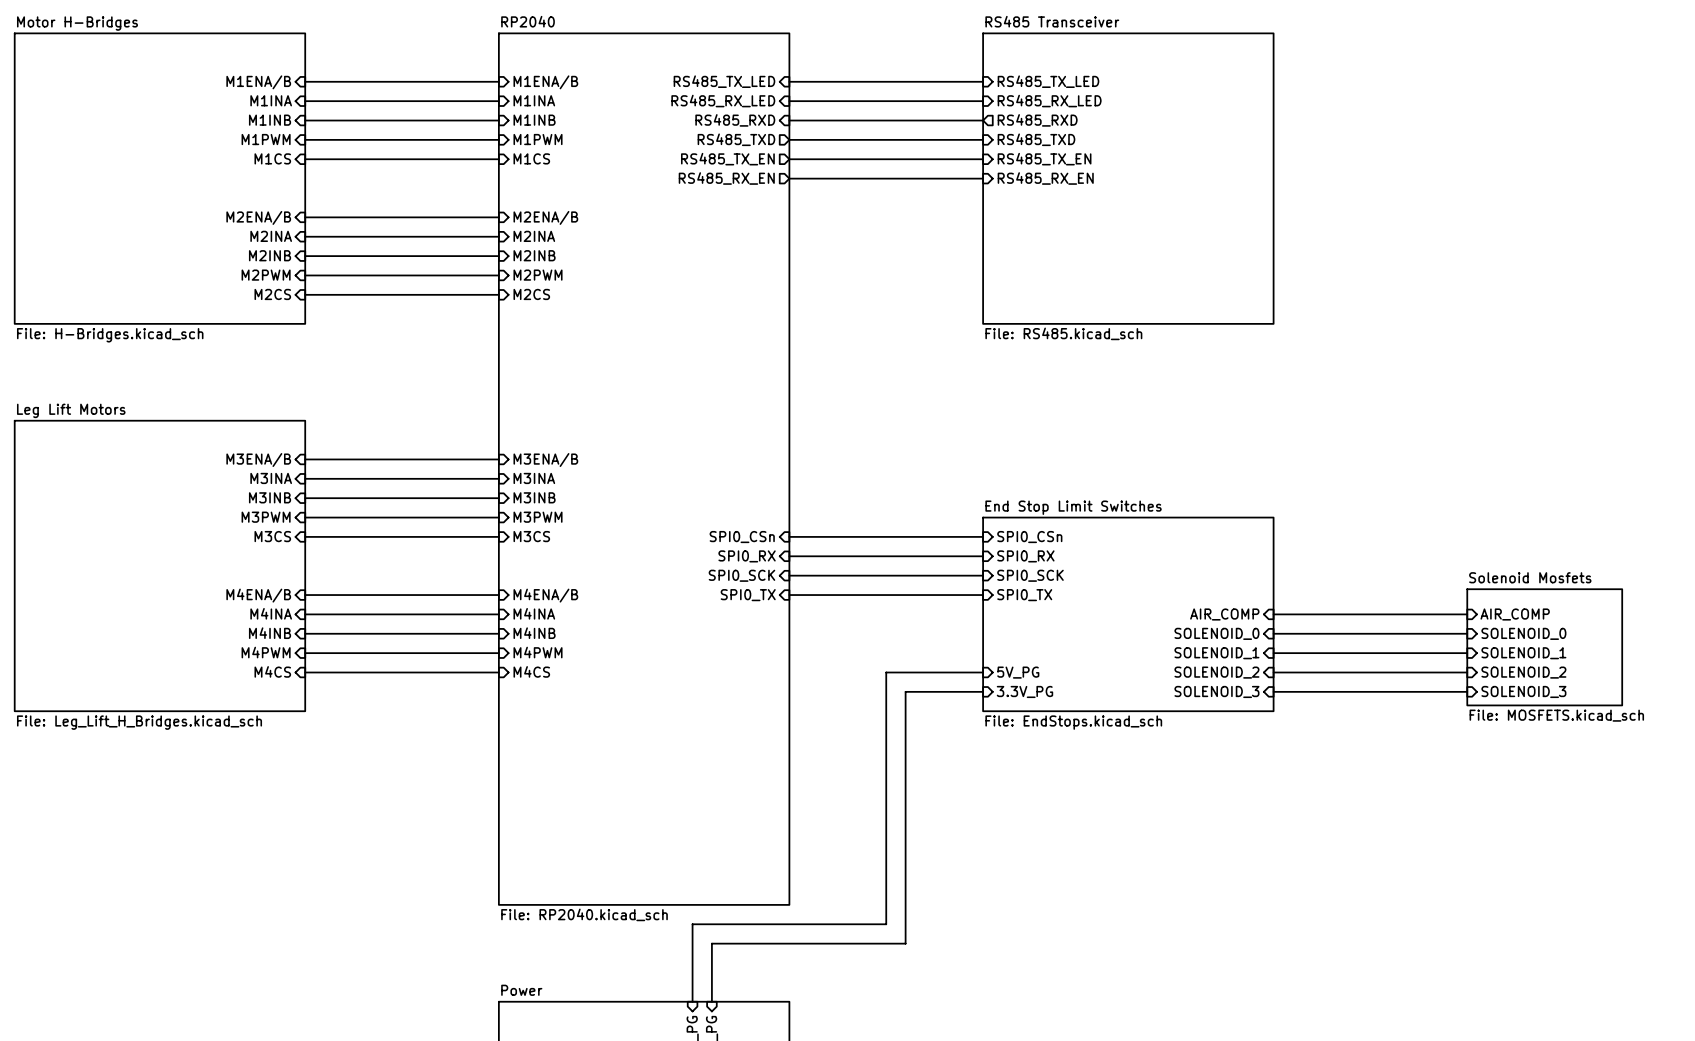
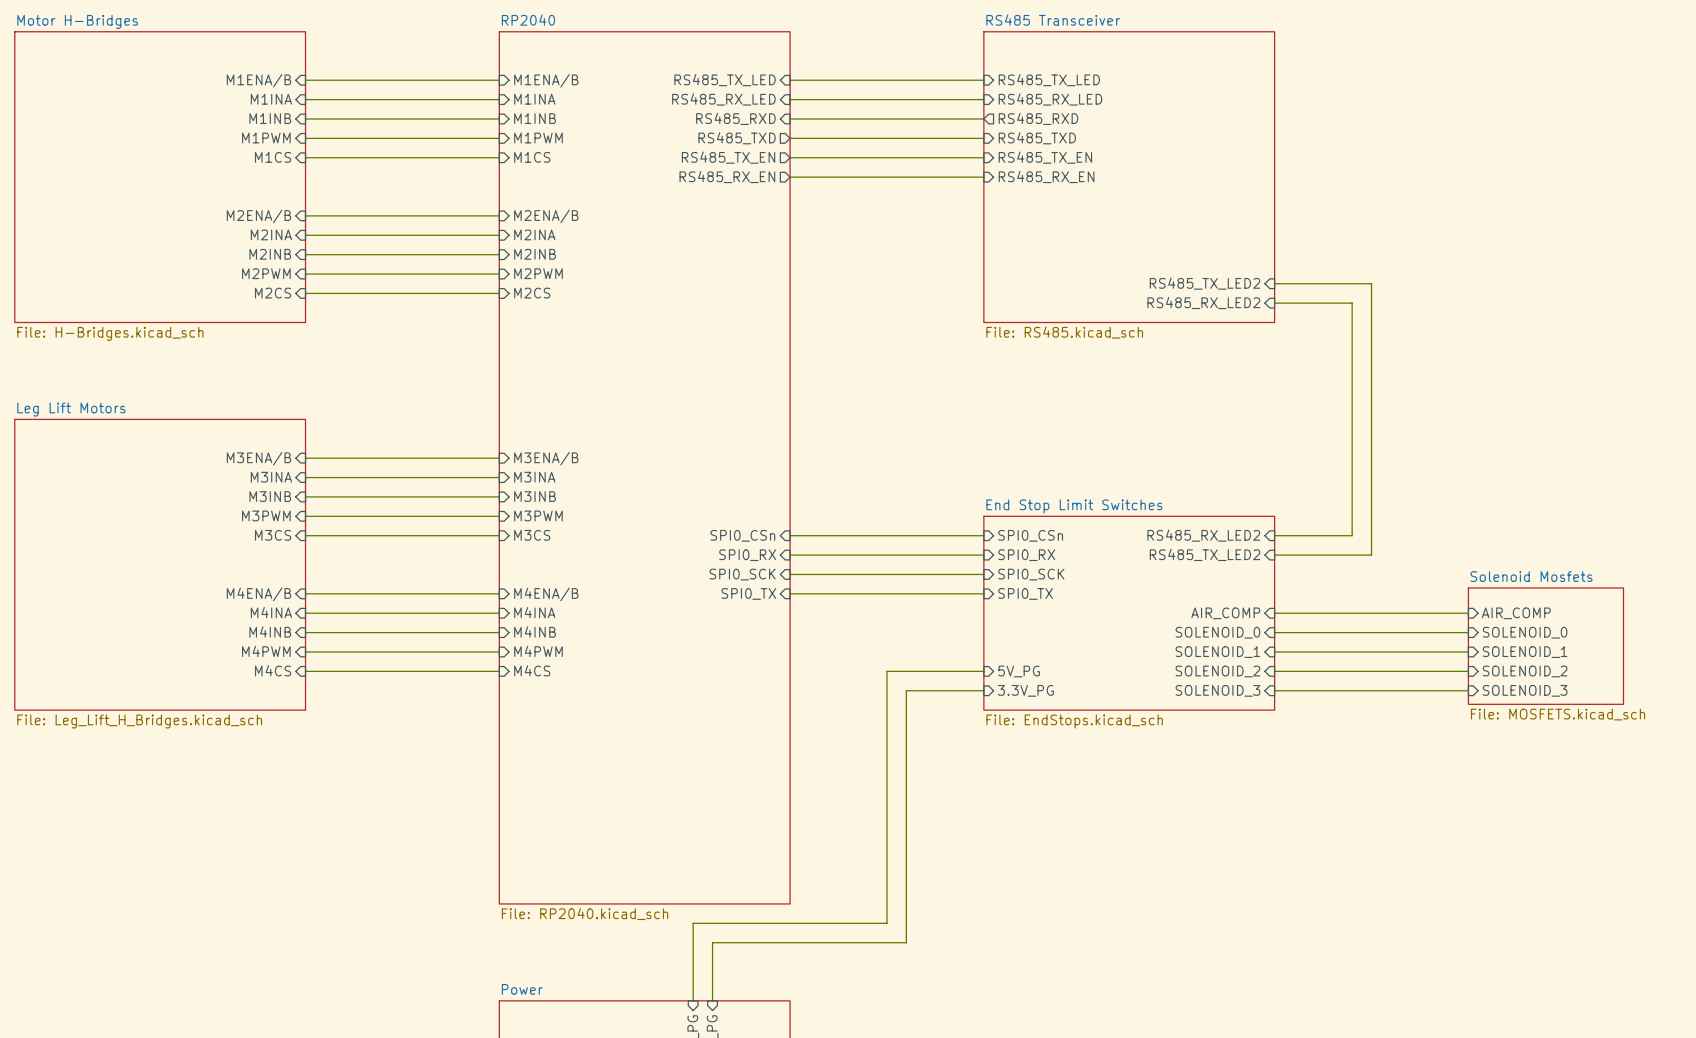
sheet pin: none -> RS485_TX_LED2 (1205, 283)
wire: none -> (1274, 283) (1371, 283) (1371, 555) (1274, 555)
sheet pin: none -> RS485_RX_LED2 (1203, 302)
wire: none -> (1274, 303) (1352, 303) (1352, 535) (1274, 535)
sheet pin: none -> RS485_RX_LED2 (1203, 535)
sheet pin: none -> RS485_TX_LED2 (1205, 554)

